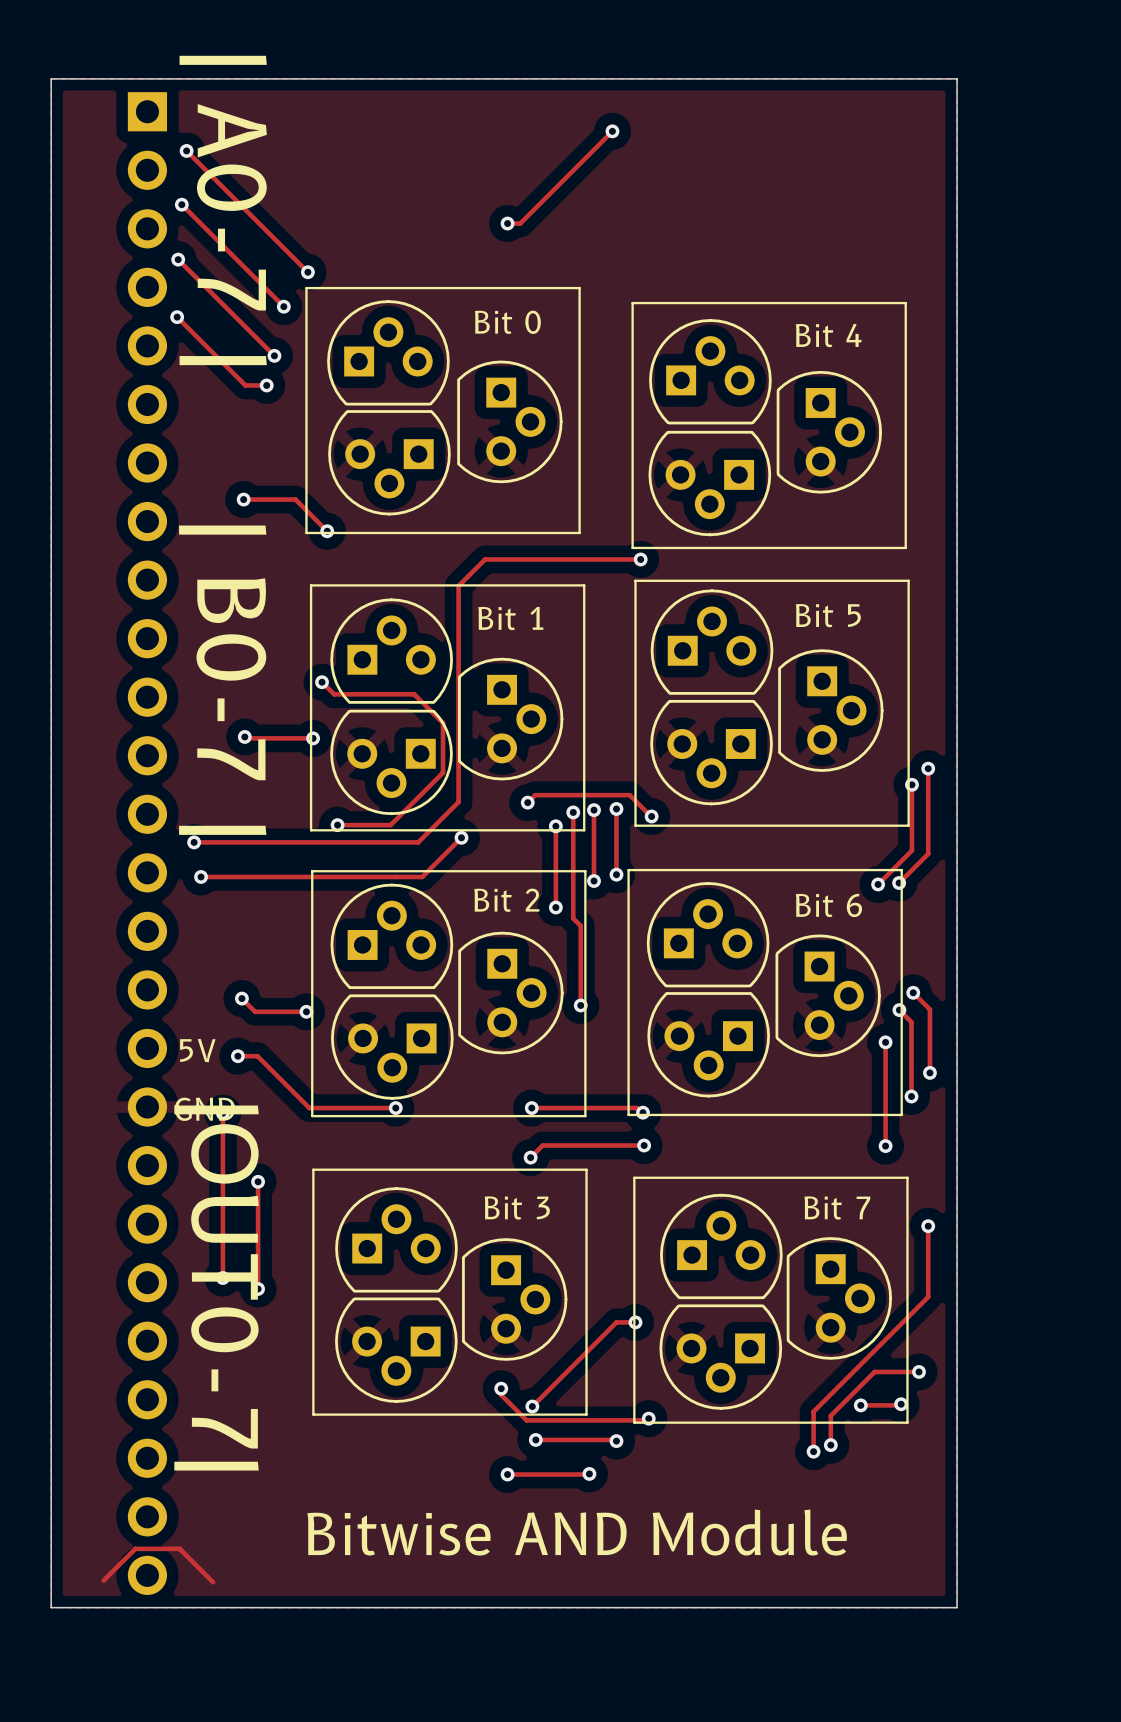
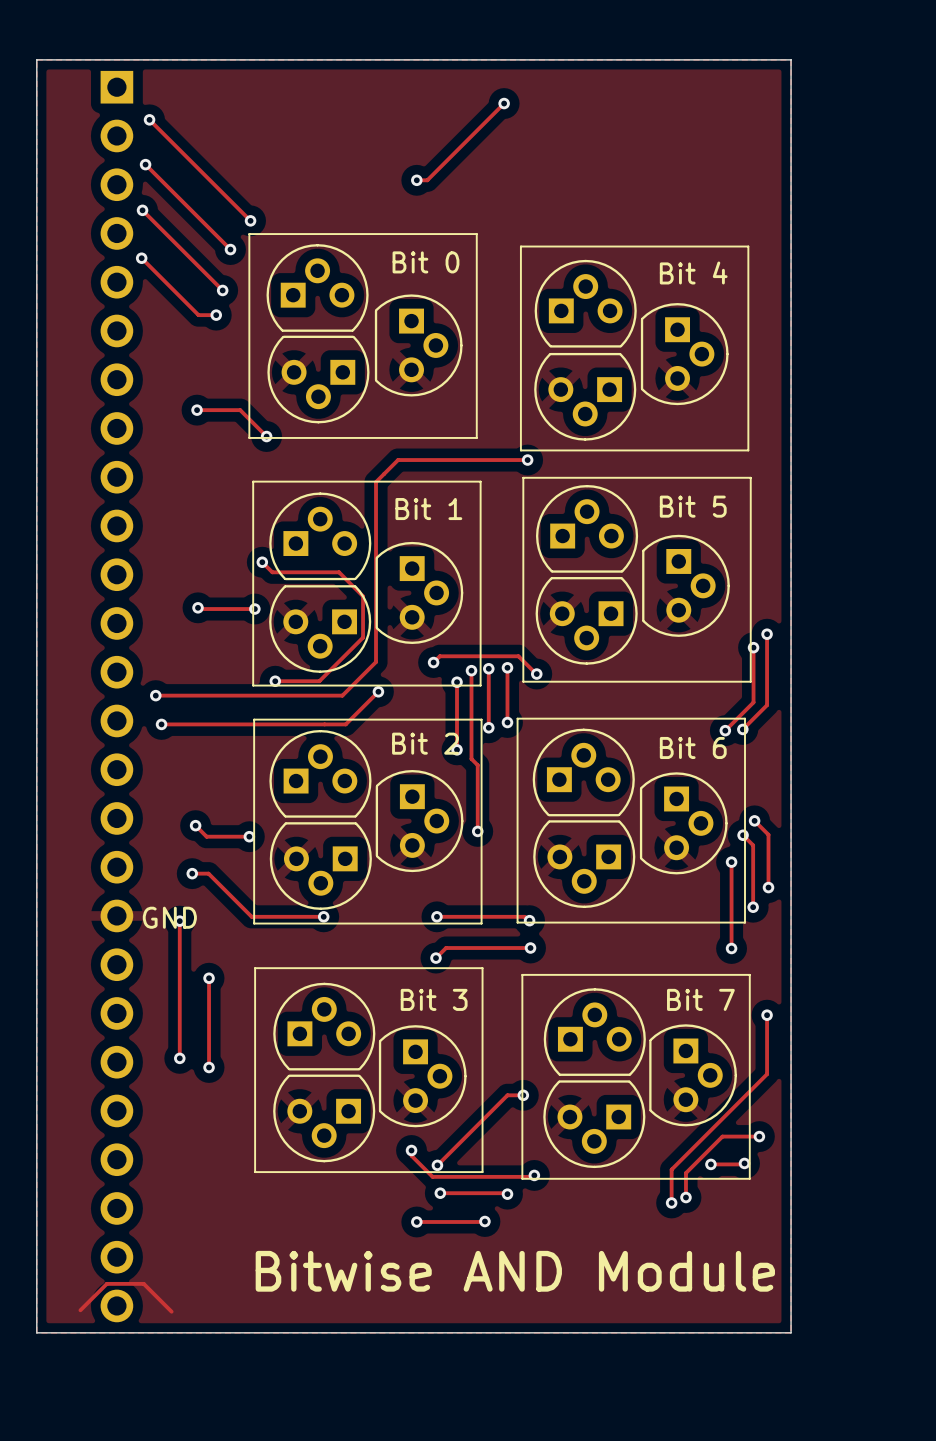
text: | A0-7 | (223, 210) -> none
text: | B0-7 | (222, 680) -> none
text: 5V (197, 1050) -> none
text: |OUT0-7| (216, 1288) -> none

